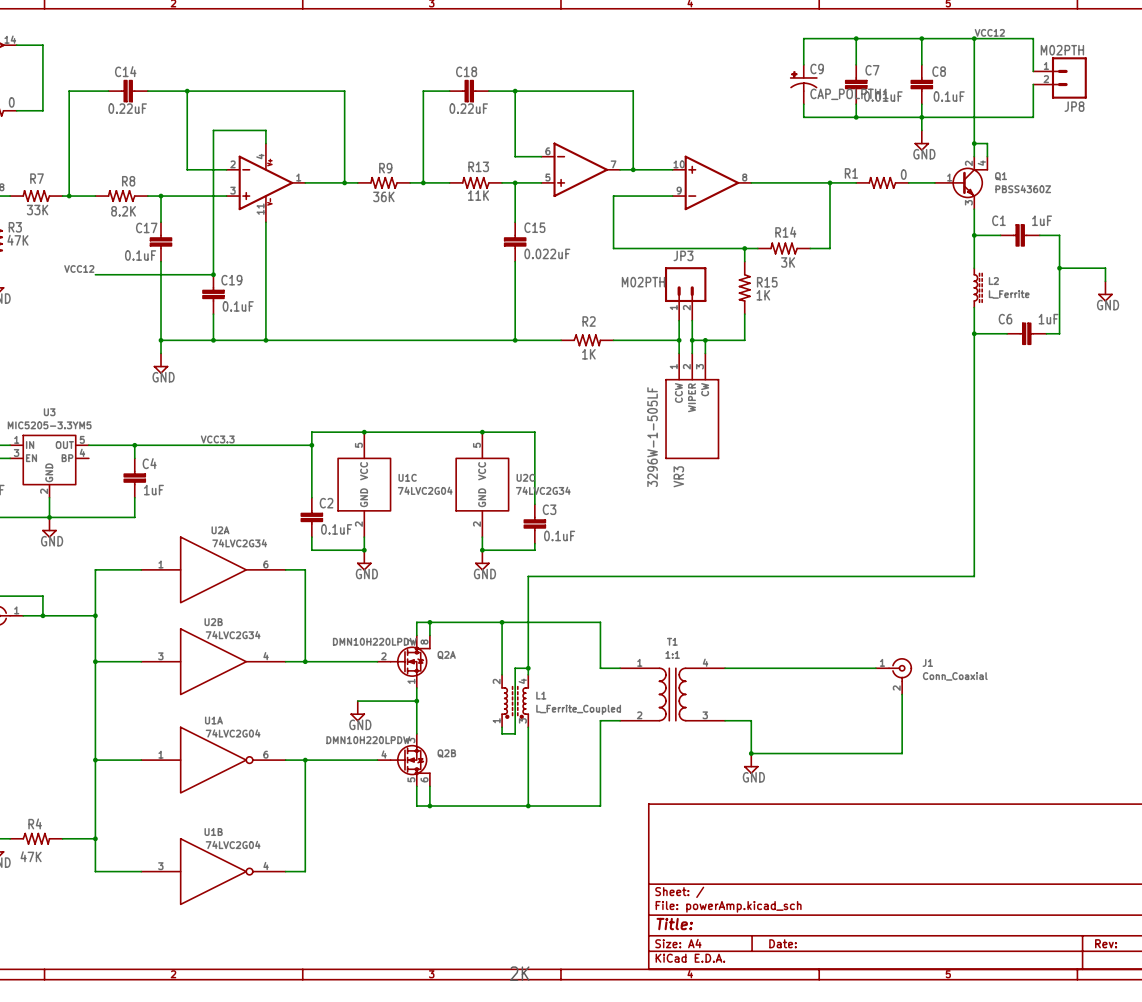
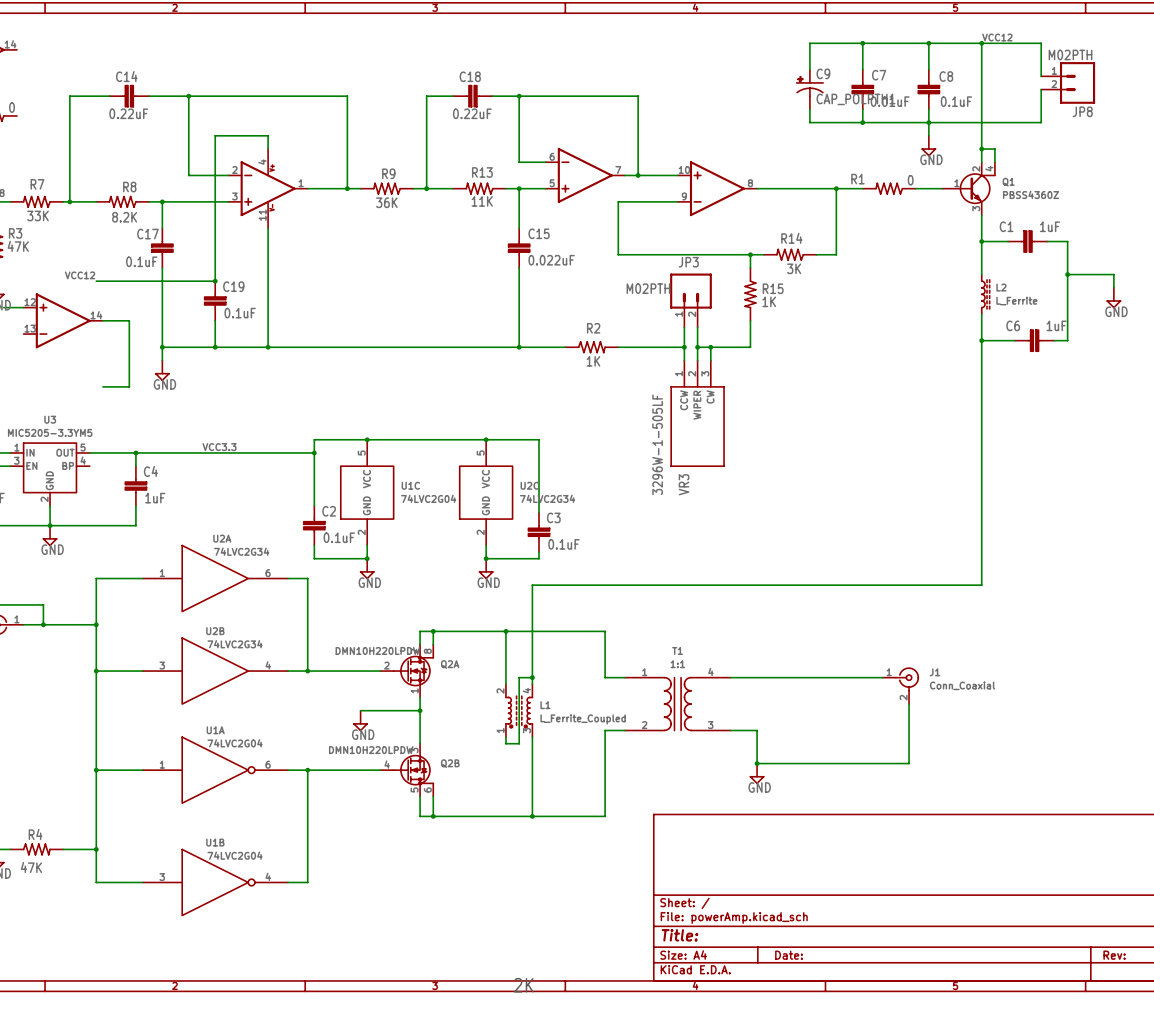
wire: (16, 45) (42, 45) (42, 110) (16, 110) -> none
wire: none -> (3, 307) (23, 307)
part: none -> (63, 320)
wire: none -> (102, 320) (129, 320) (129, 386) (102, 386)

